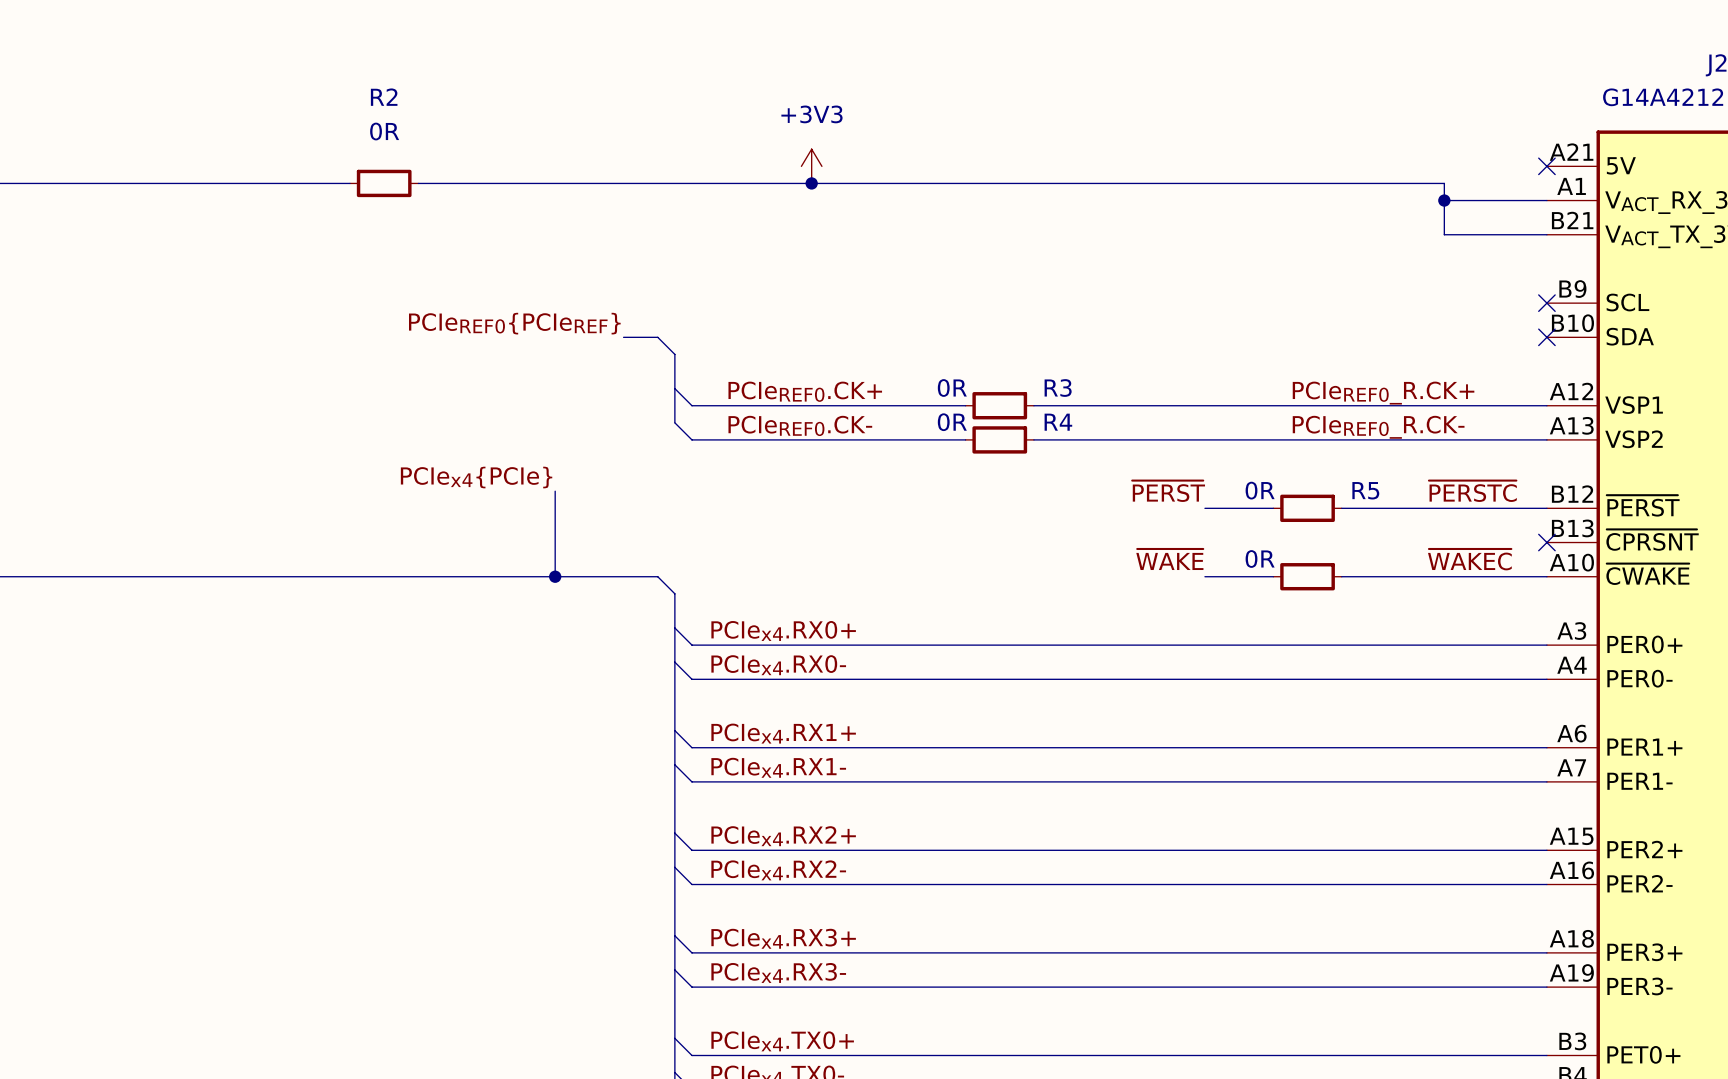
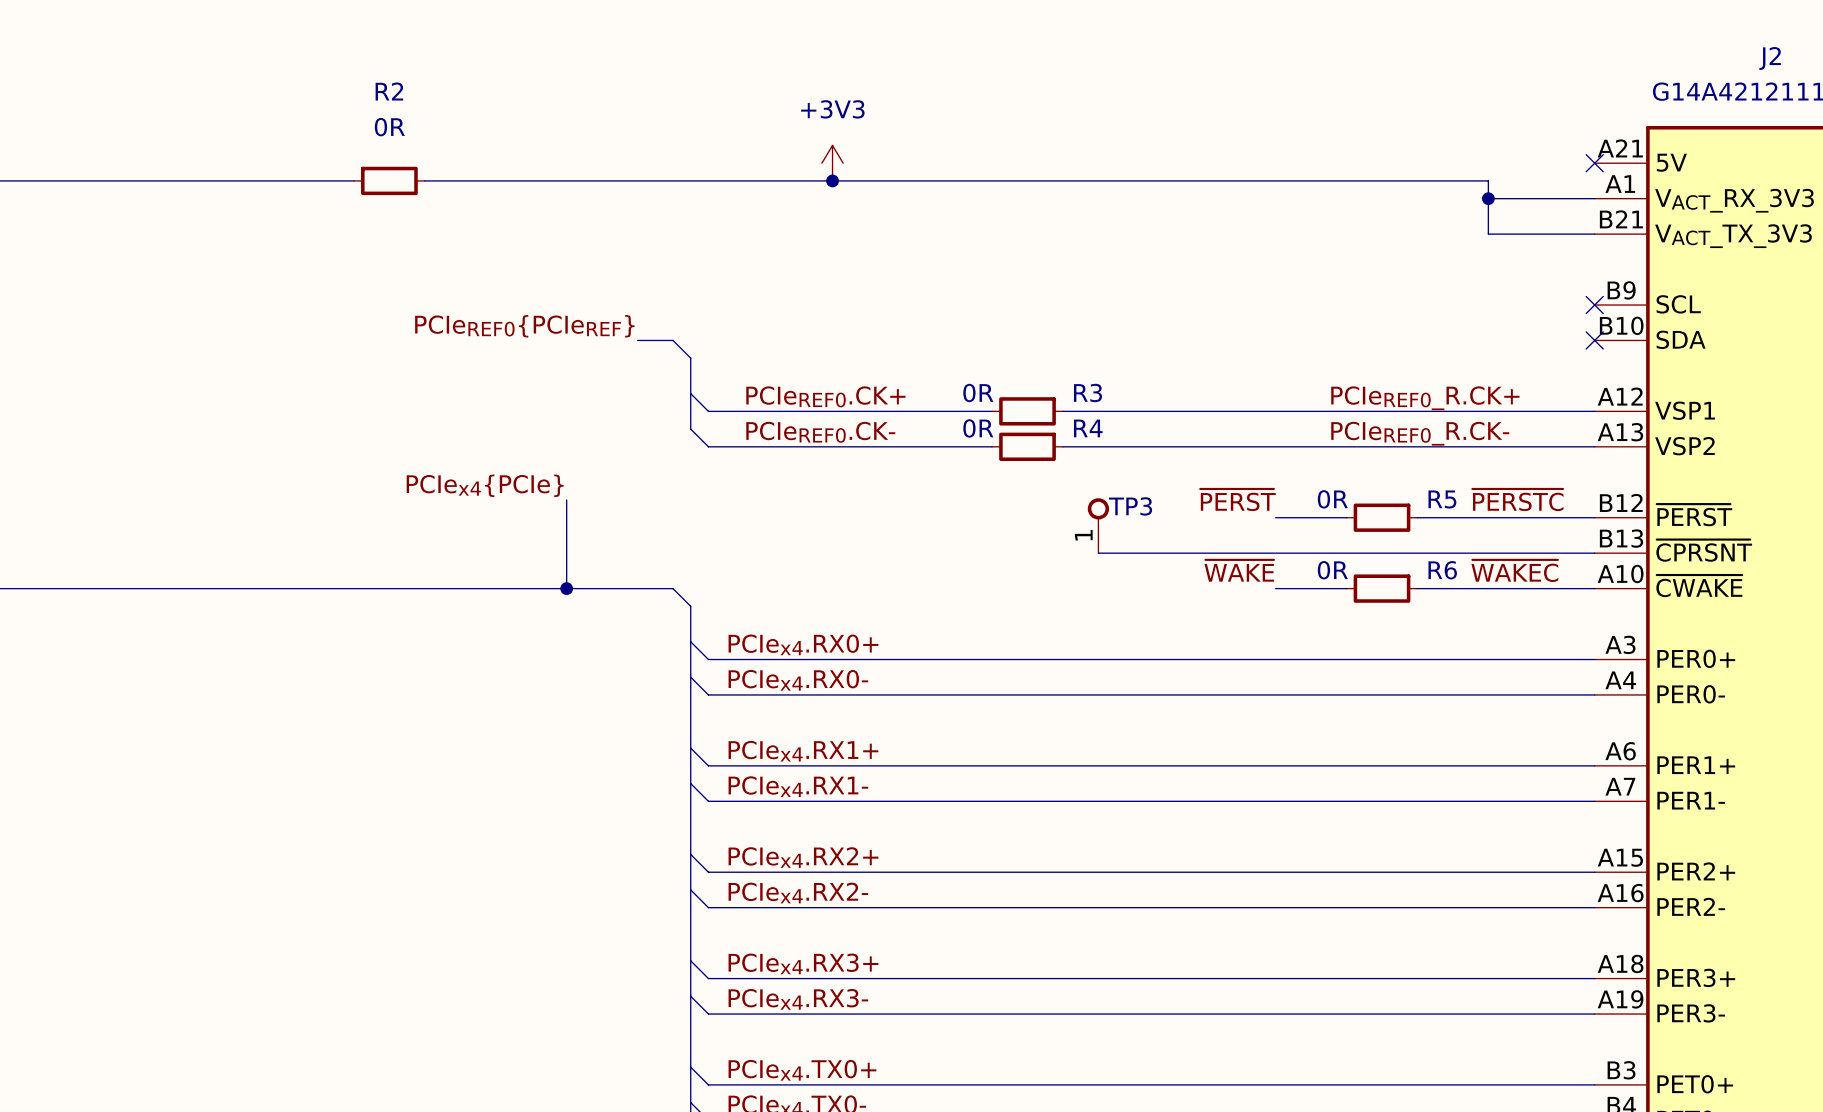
label position: ~{PERST} (1168, 491) -> ~{PERST} (1237, 500)
wire: (1204, 508) (1239, 508) -> (1311, 517) (1346, 517)
R5 position: (1307, 508) -> (1382, 517)
wire: (1341, 508) (1375, 508) -> none
TP3: none -> (1098, 525)
wire: none -> (1098, 553) (1594, 553)
no-connect mark: (1546, 542) -> none
label position: ~{WAKE} (1169, 559) -> ~{WAKE} (1239, 570)
wire: (1204, 576) (1239, 576) -> (1311, 588) (1346, 588)
part: (1307, 576) -> none
wire: (1341, 576) (1375, 576) -> none
R6: none -> (1382, 588)

